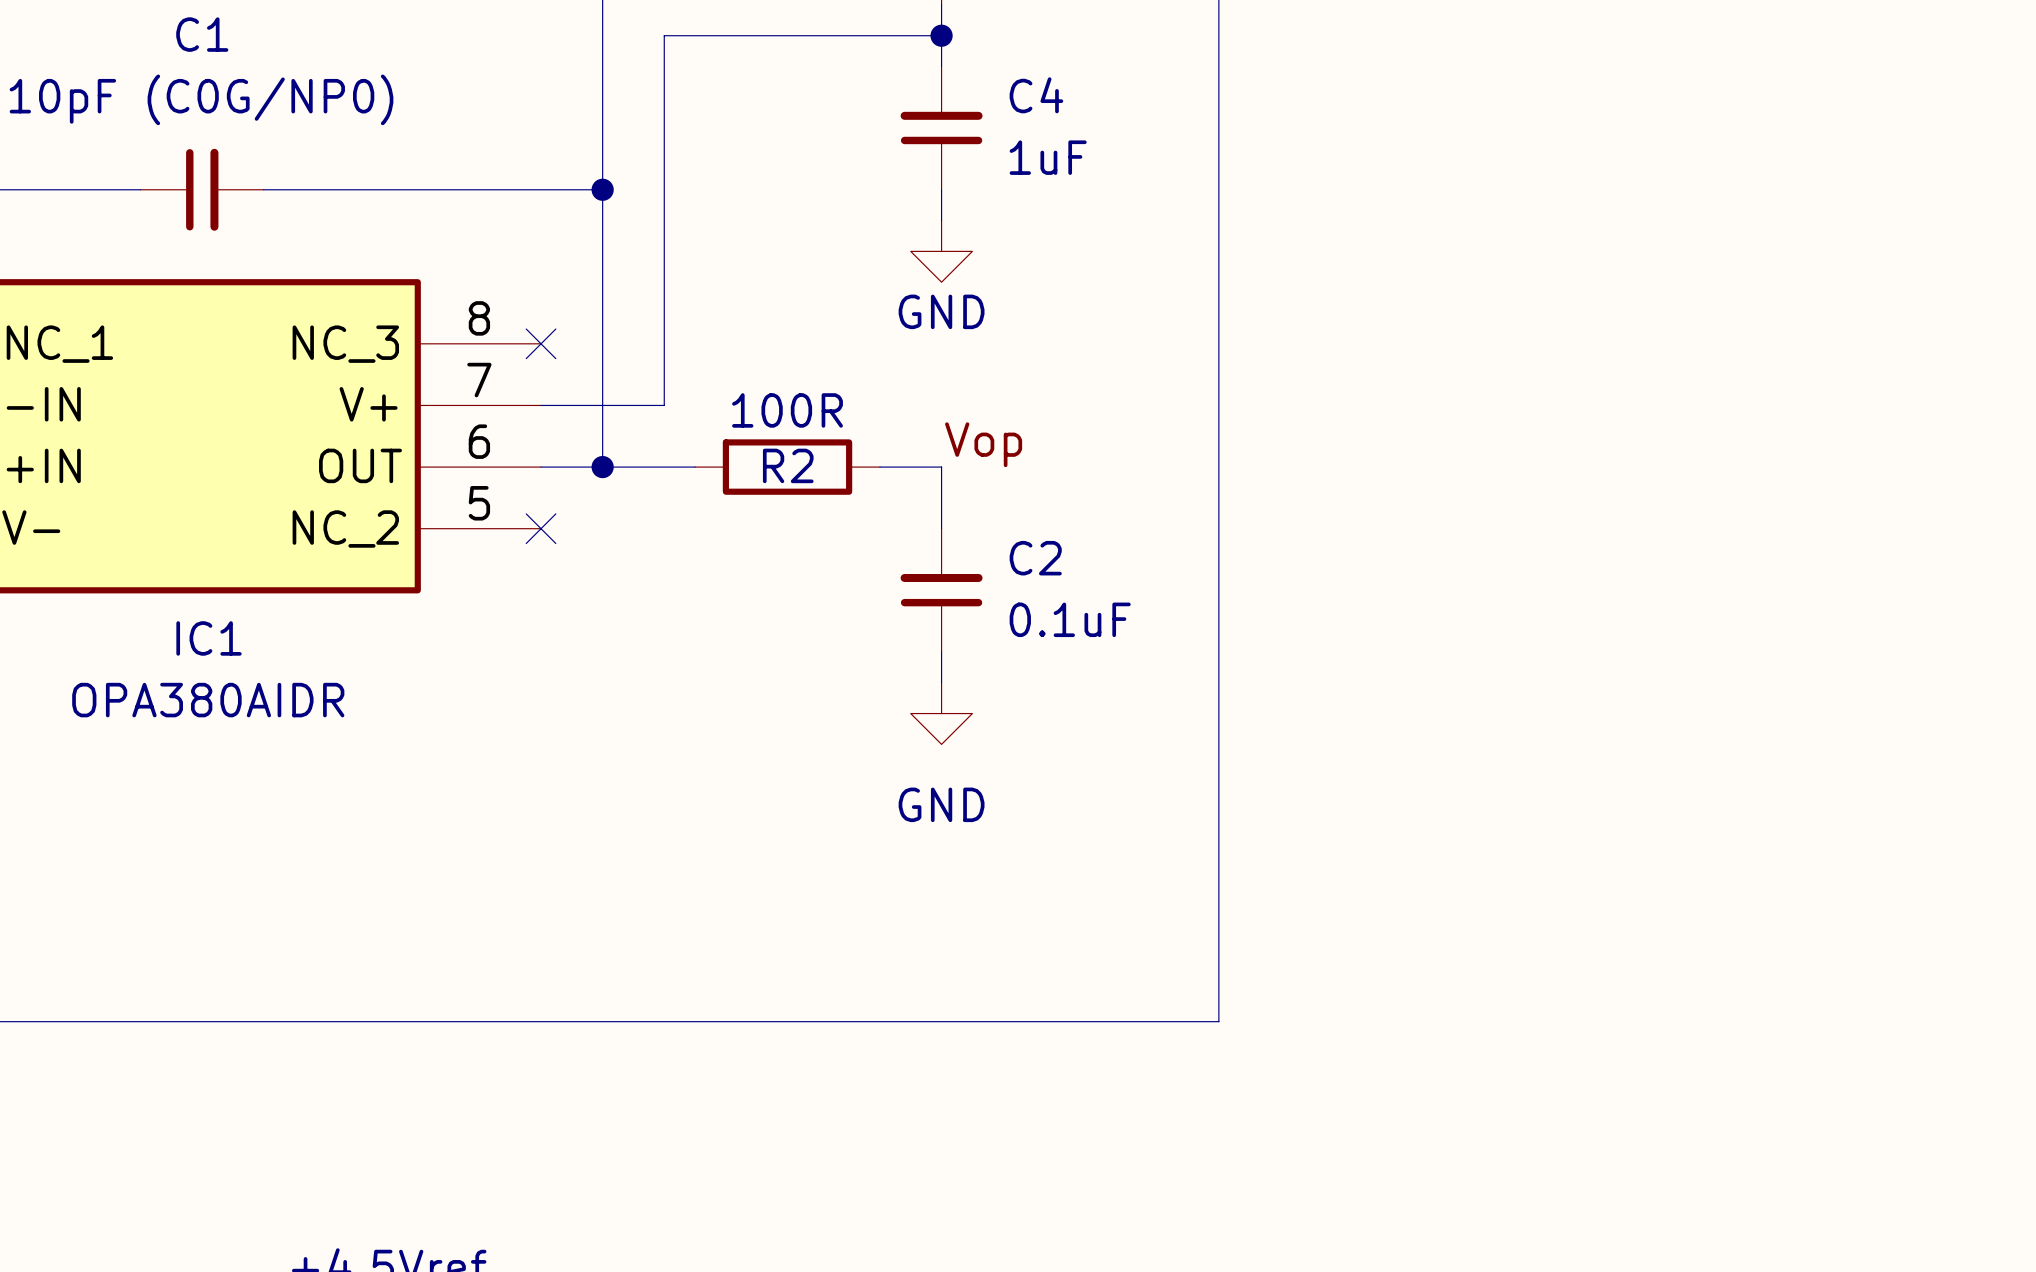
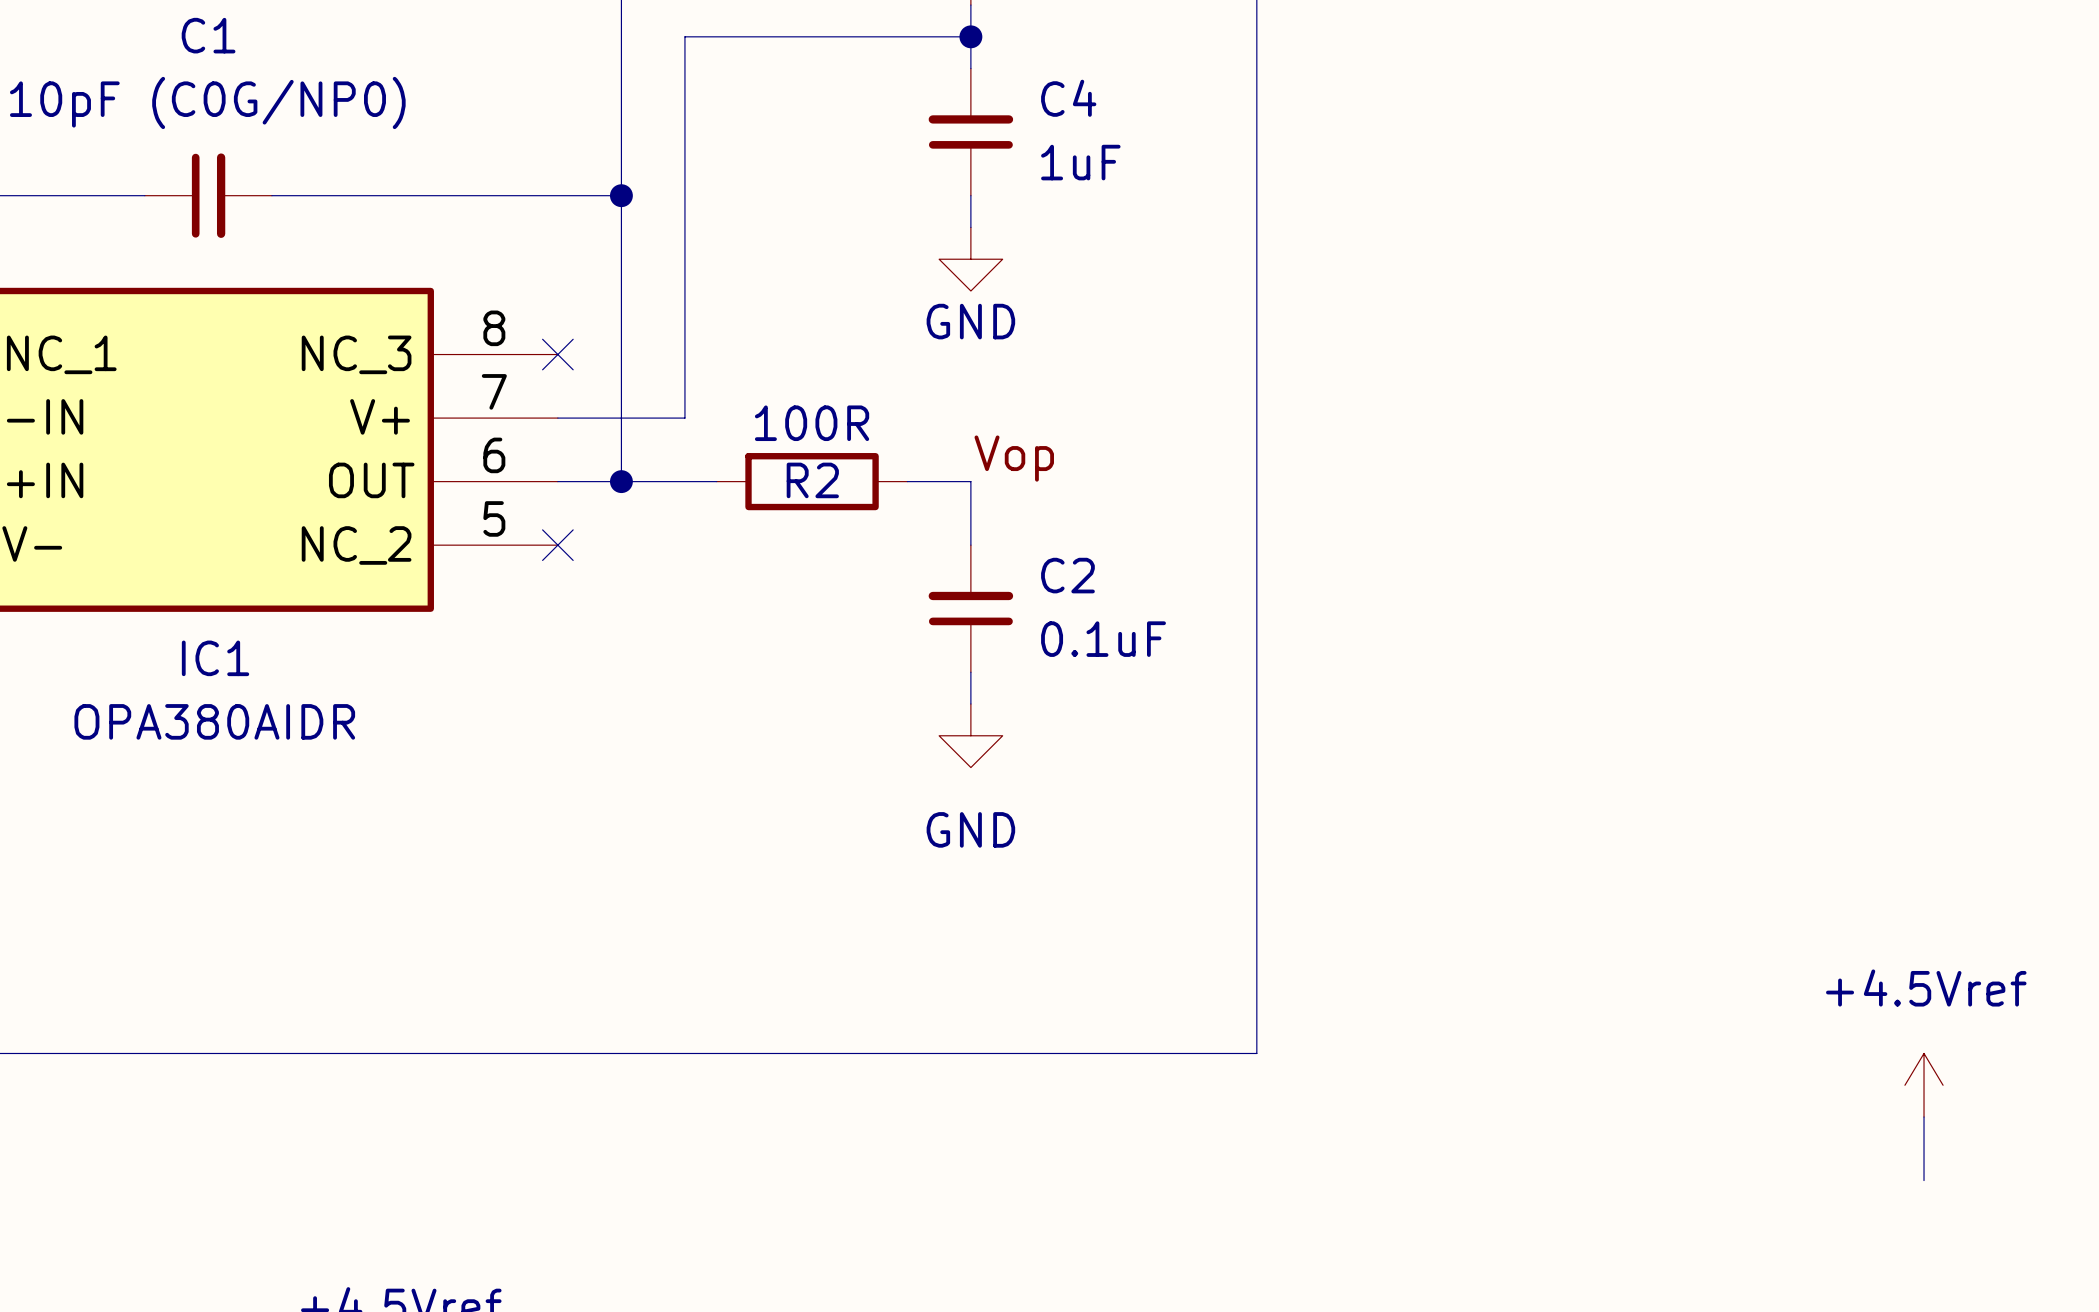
power symbol: none -> +4.5Vref (1924, 1085)
wire: none -> (1924, 1117) (1924, 1180)

